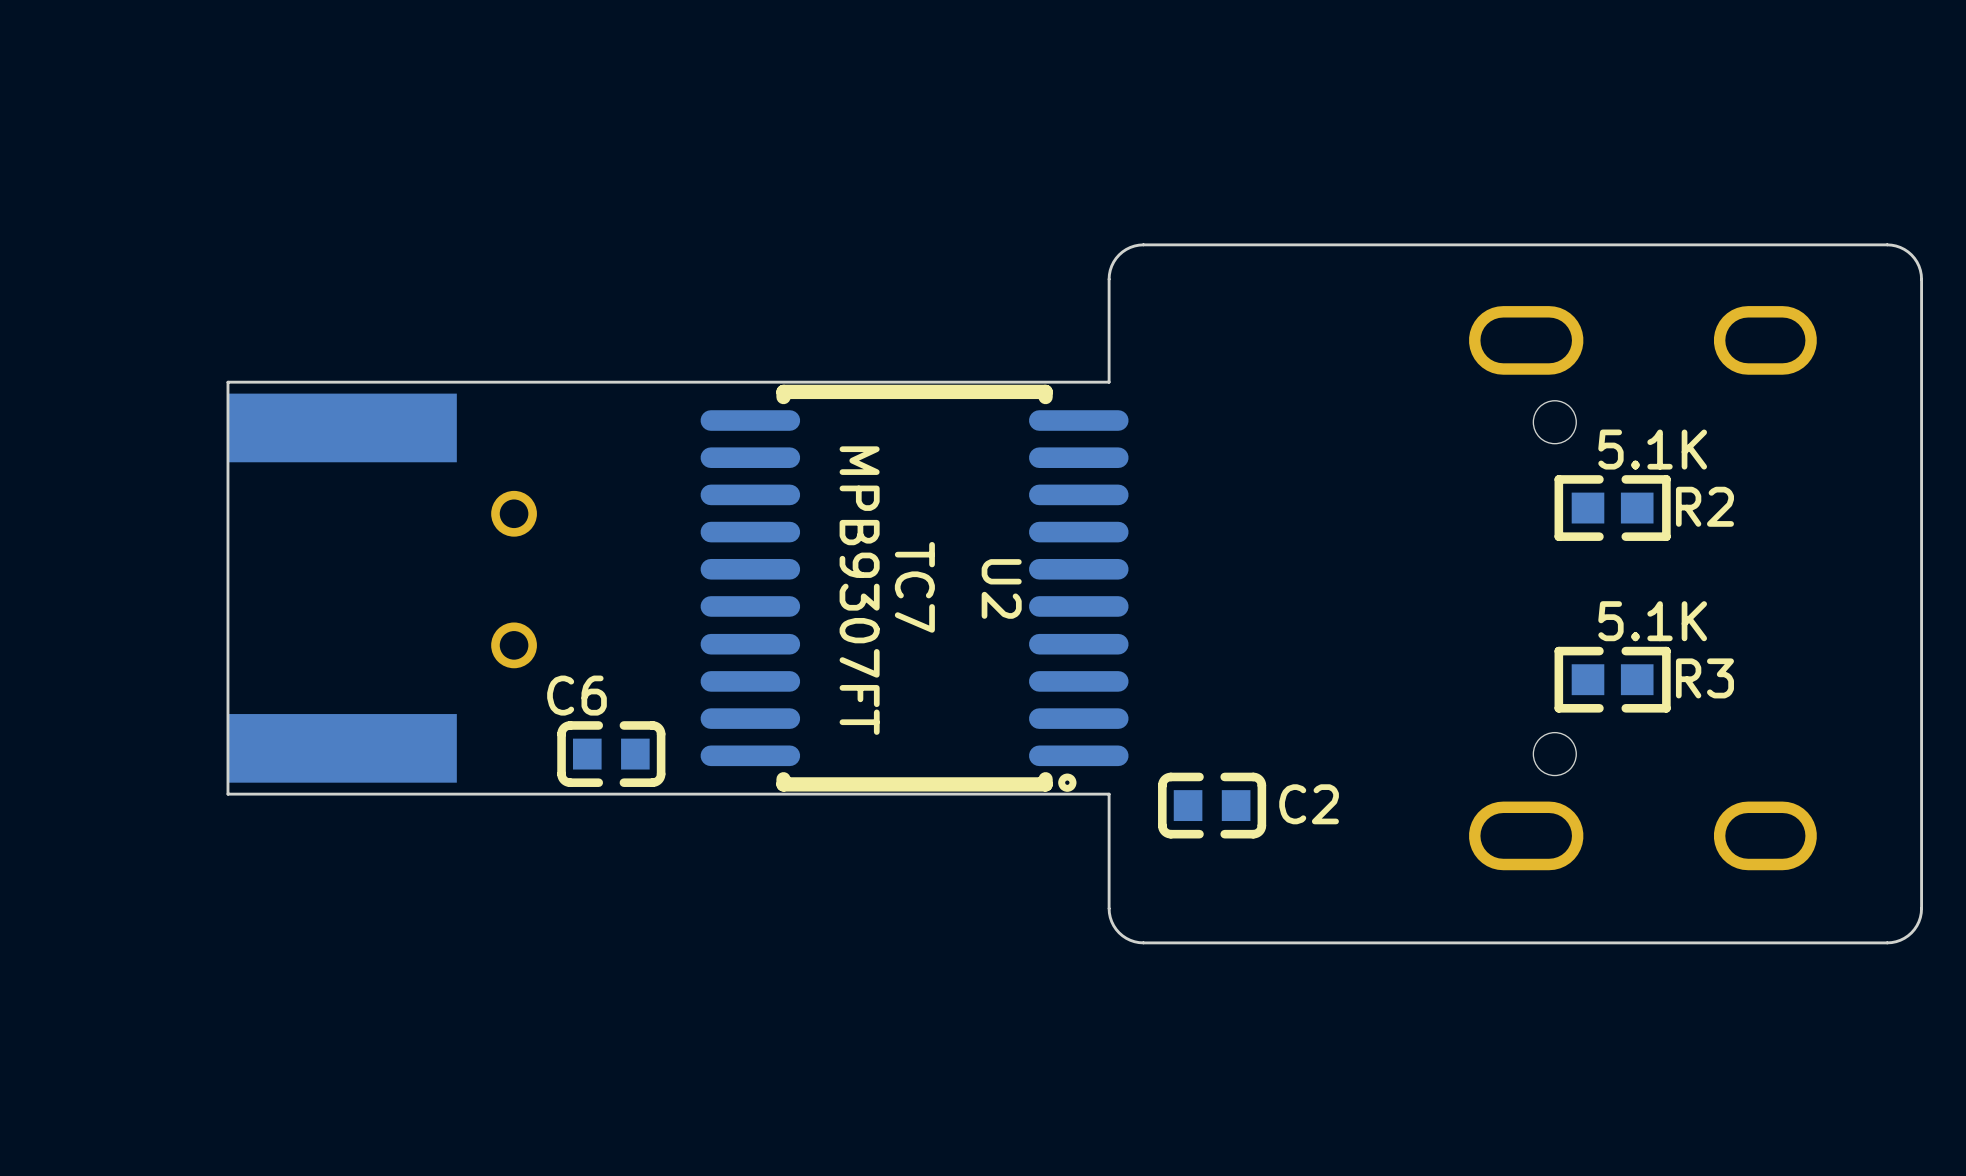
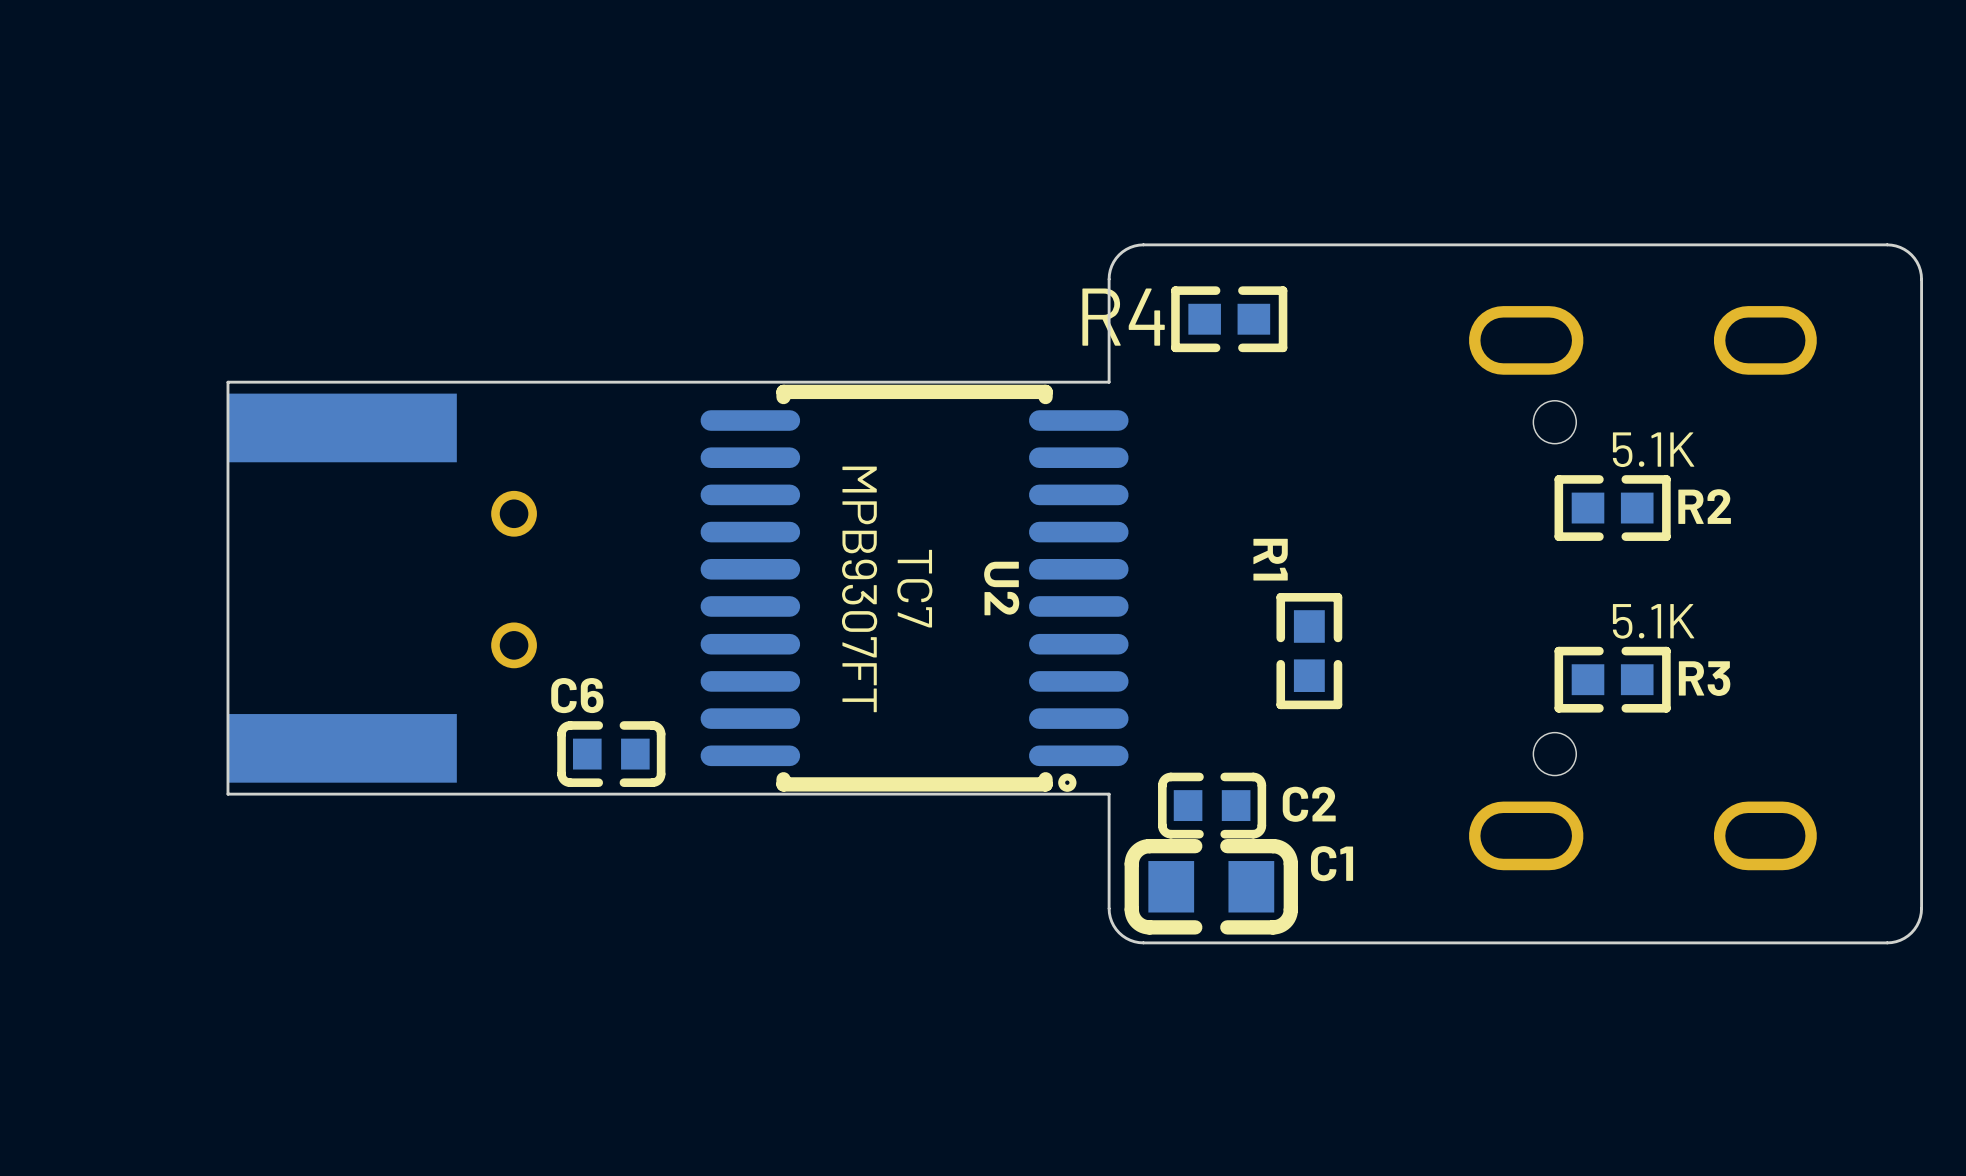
R4: none -> (1229, 319)
R1: none -> (1309, 651)
C1: none -> (1211, 886)

